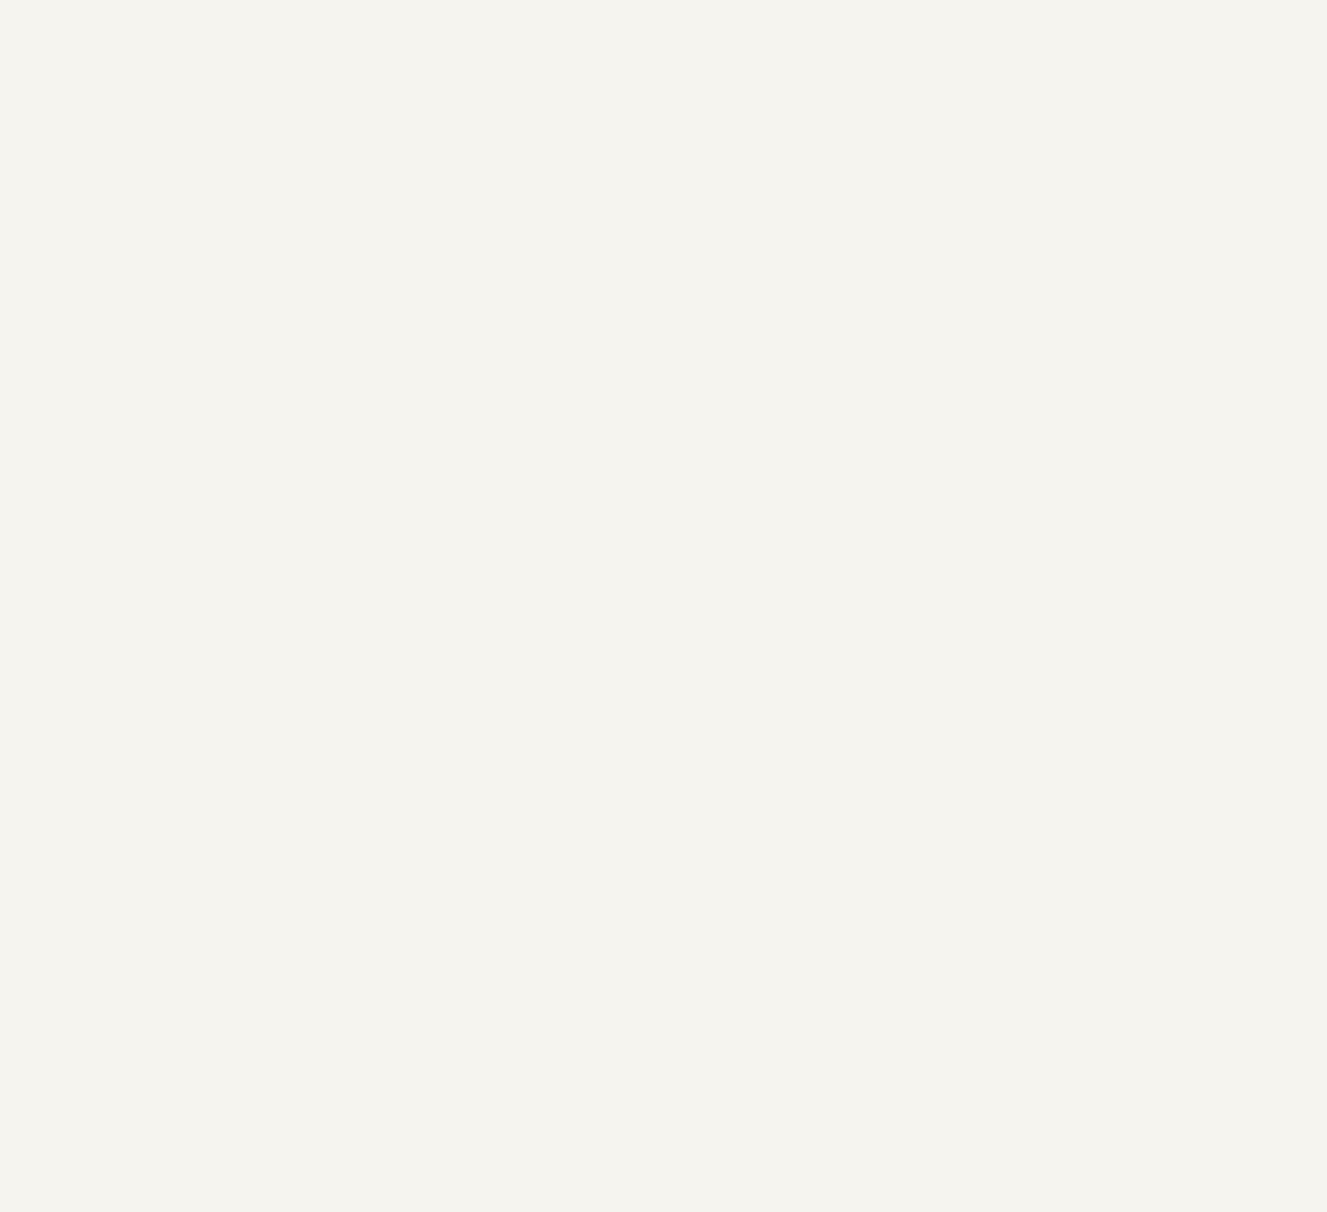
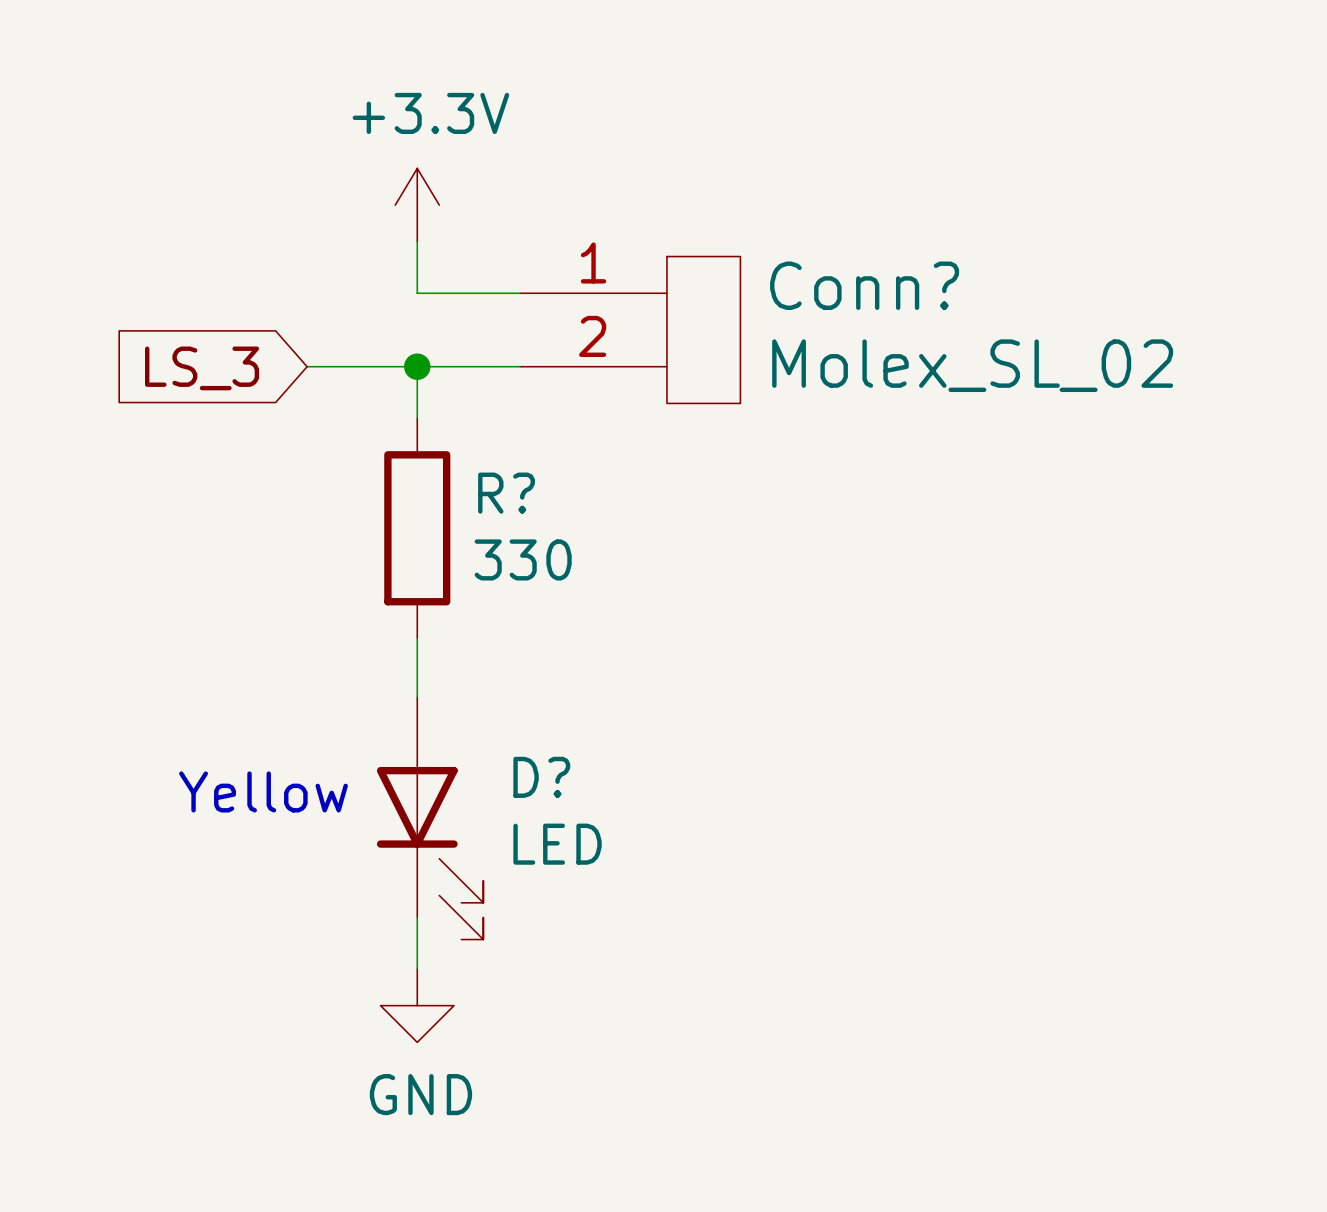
power symbol: none -> +3.3V (417, 205)
wire: none -> (417, 241) (417, 293) (520, 293)
Conn?: none -> Molex_SL_02 (630, 329)
wire: none -> (307, 366) (520, 366)
wire: none -> (417, 366) (417, 418)
junction: none -> (417, 366)
global label: none -> LS_3 (202, 368)
R?: none -> 330 (417, 528)
wire: none -> (417, 638) (417, 697)
text: none -> Yellow (263, 791)
D?: none -> LED (430, 818)
wire: none -> (417, 917) (417, 968)
power symbol: none -> GND (417, 1005)

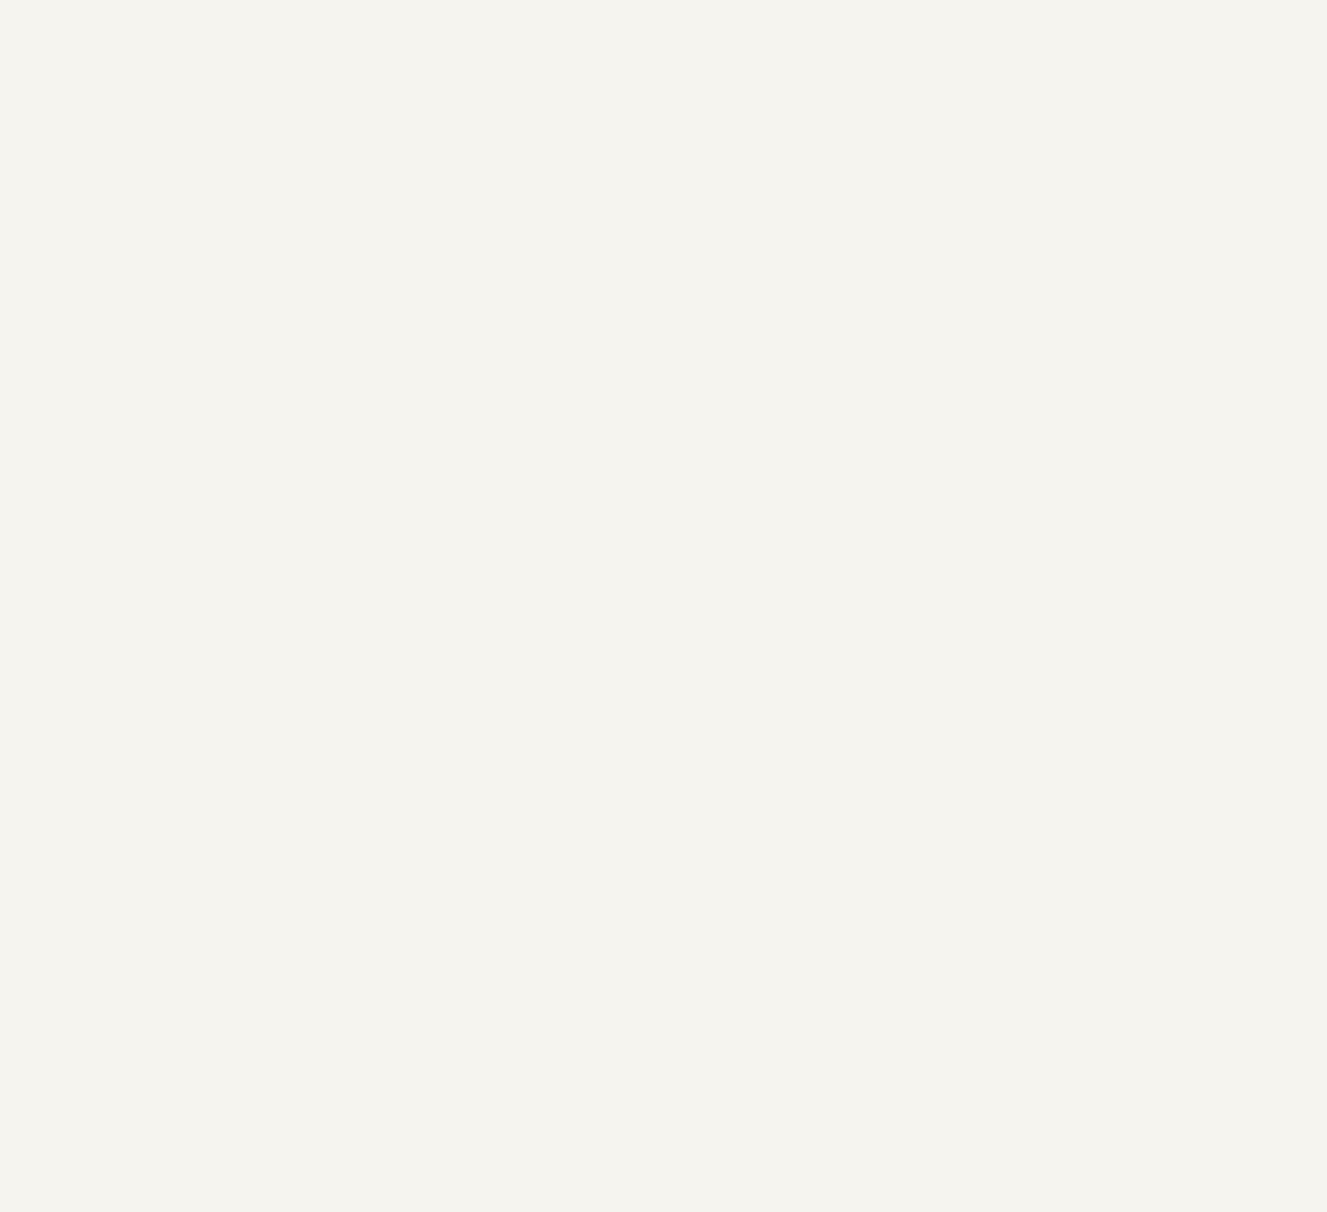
power symbol: +3.3V (417, 205) -> none
wire: (417, 241) (417, 293) (520, 293) -> none
Conn?: Molex_SL_02 (630, 329) -> none
wire: (307, 366) (520, 366) -> none
wire: (417, 366) (417, 418) -> none
junction: (417, 366) -> none
global label: LS_3 (202, 368) -> none
R?: 330 (417, 528) -> none
wire: (417, 638) (417, 697) -> none
text: Yellow (263, 791) -> none
D?: LED (430, 818) -> none
wire: (417, 917) (417, 968) -> none
power symbol: GND (417, 1005) -> none

